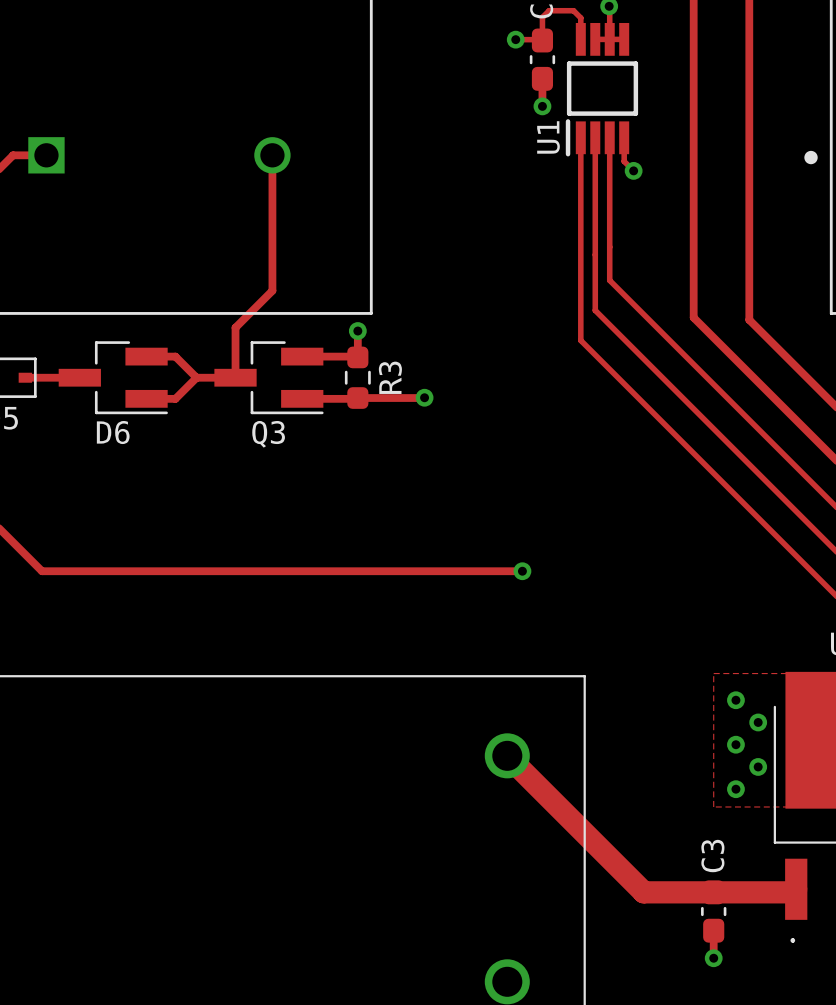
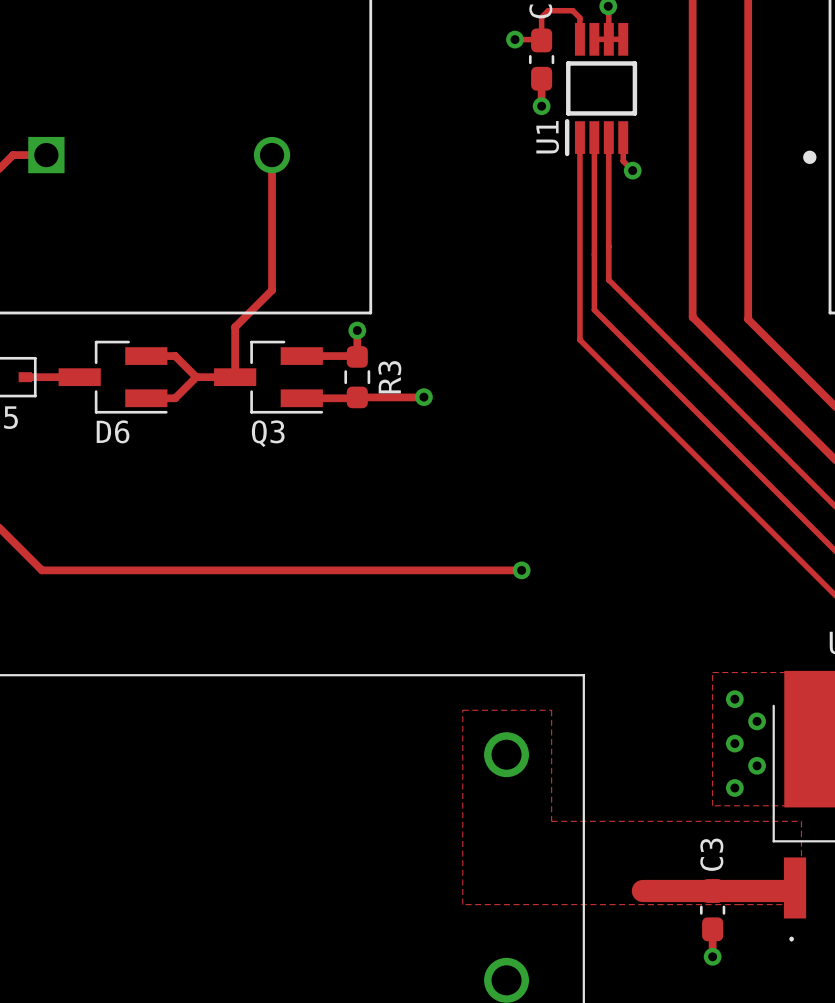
zone outline: none -> (462, 710) (462, 904) (801, 904) (801, 821) (551, 821) (551, 710) (462, 710)
track: (507, 755) (643, 892) -> none

